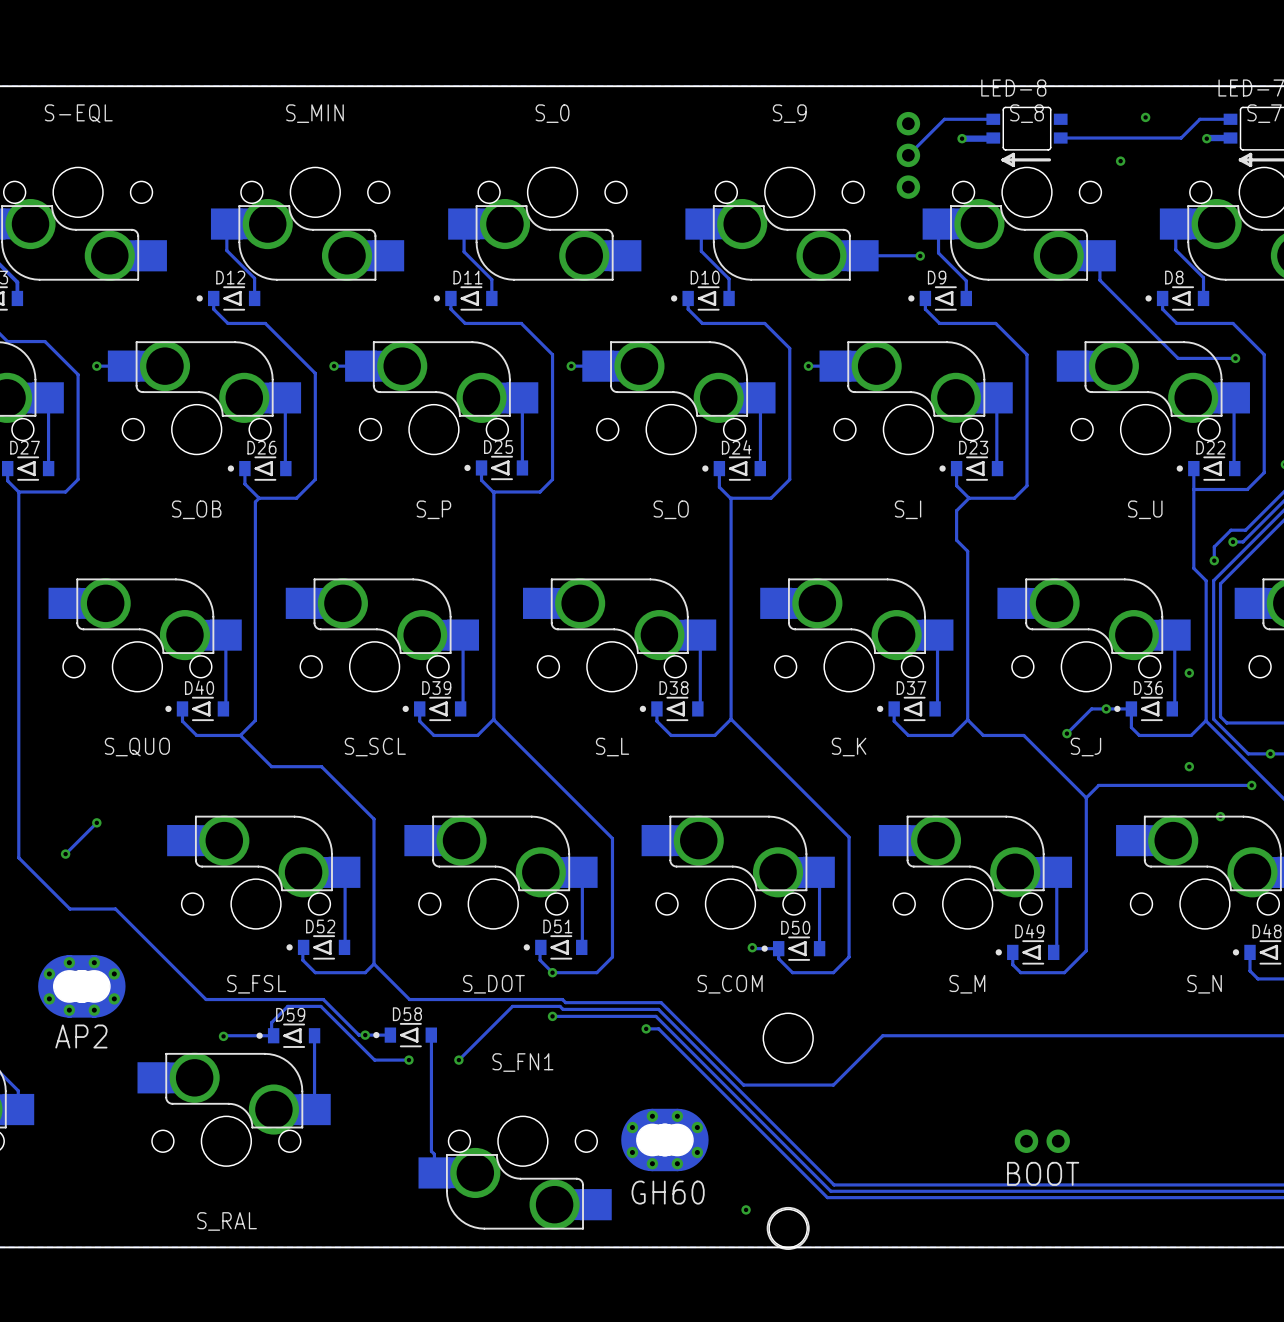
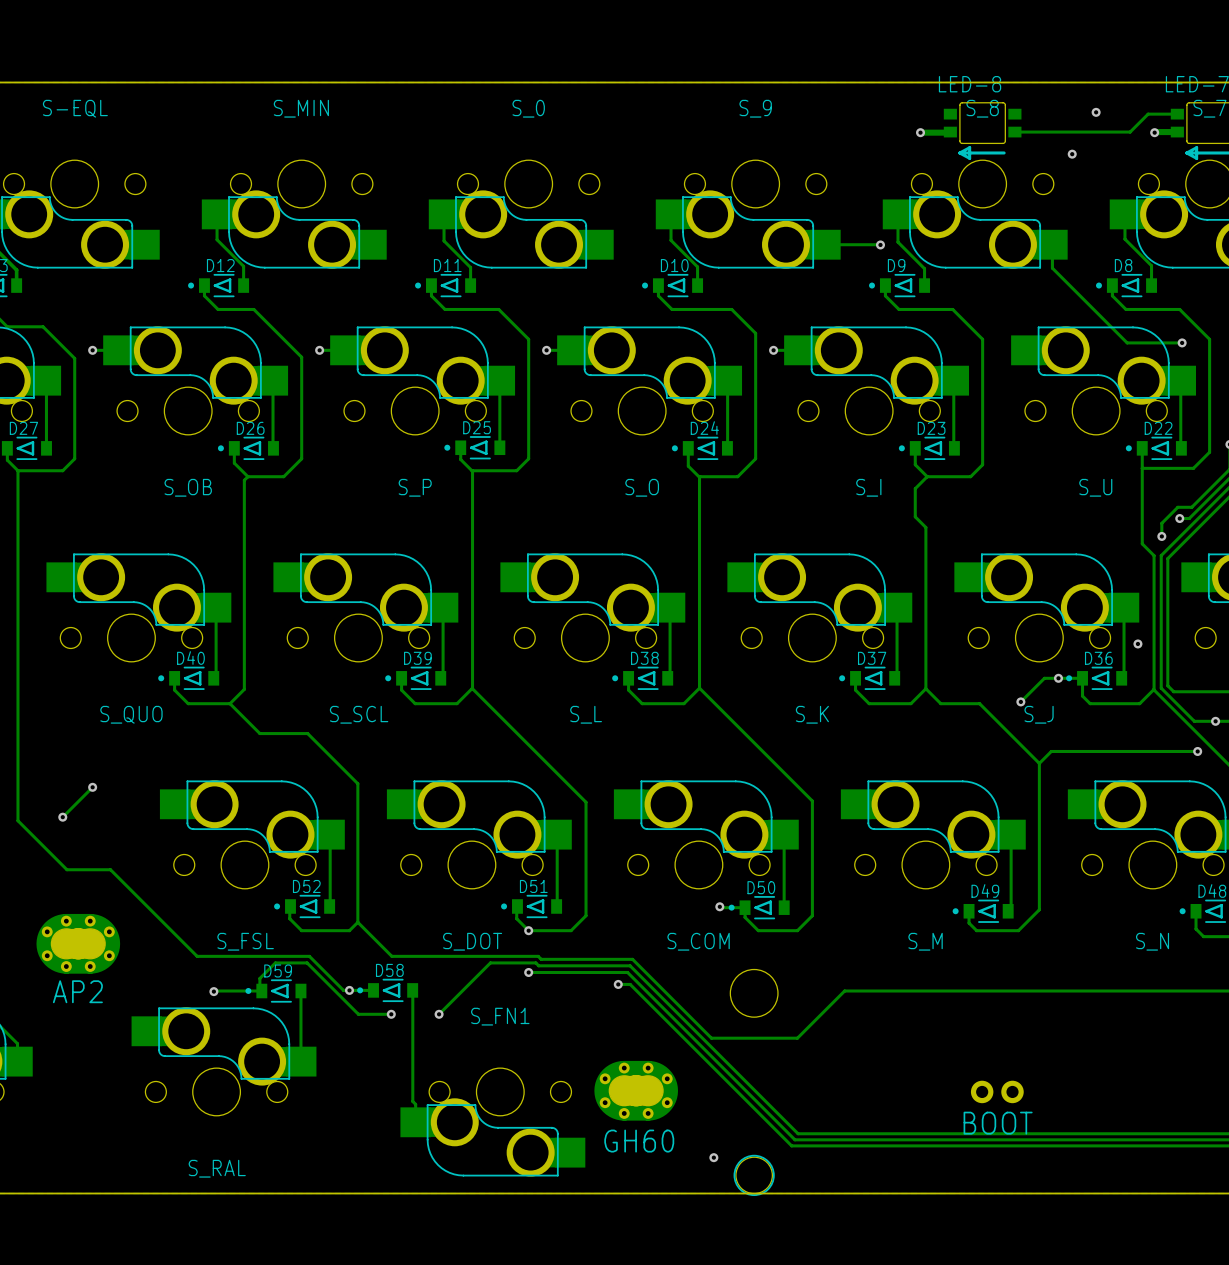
track: (993, 119) (944, 119) (908, 155) -> none
part: (908, 155) -> none
via: (1189, 766) -> none
via: (1220, 816) -> none

